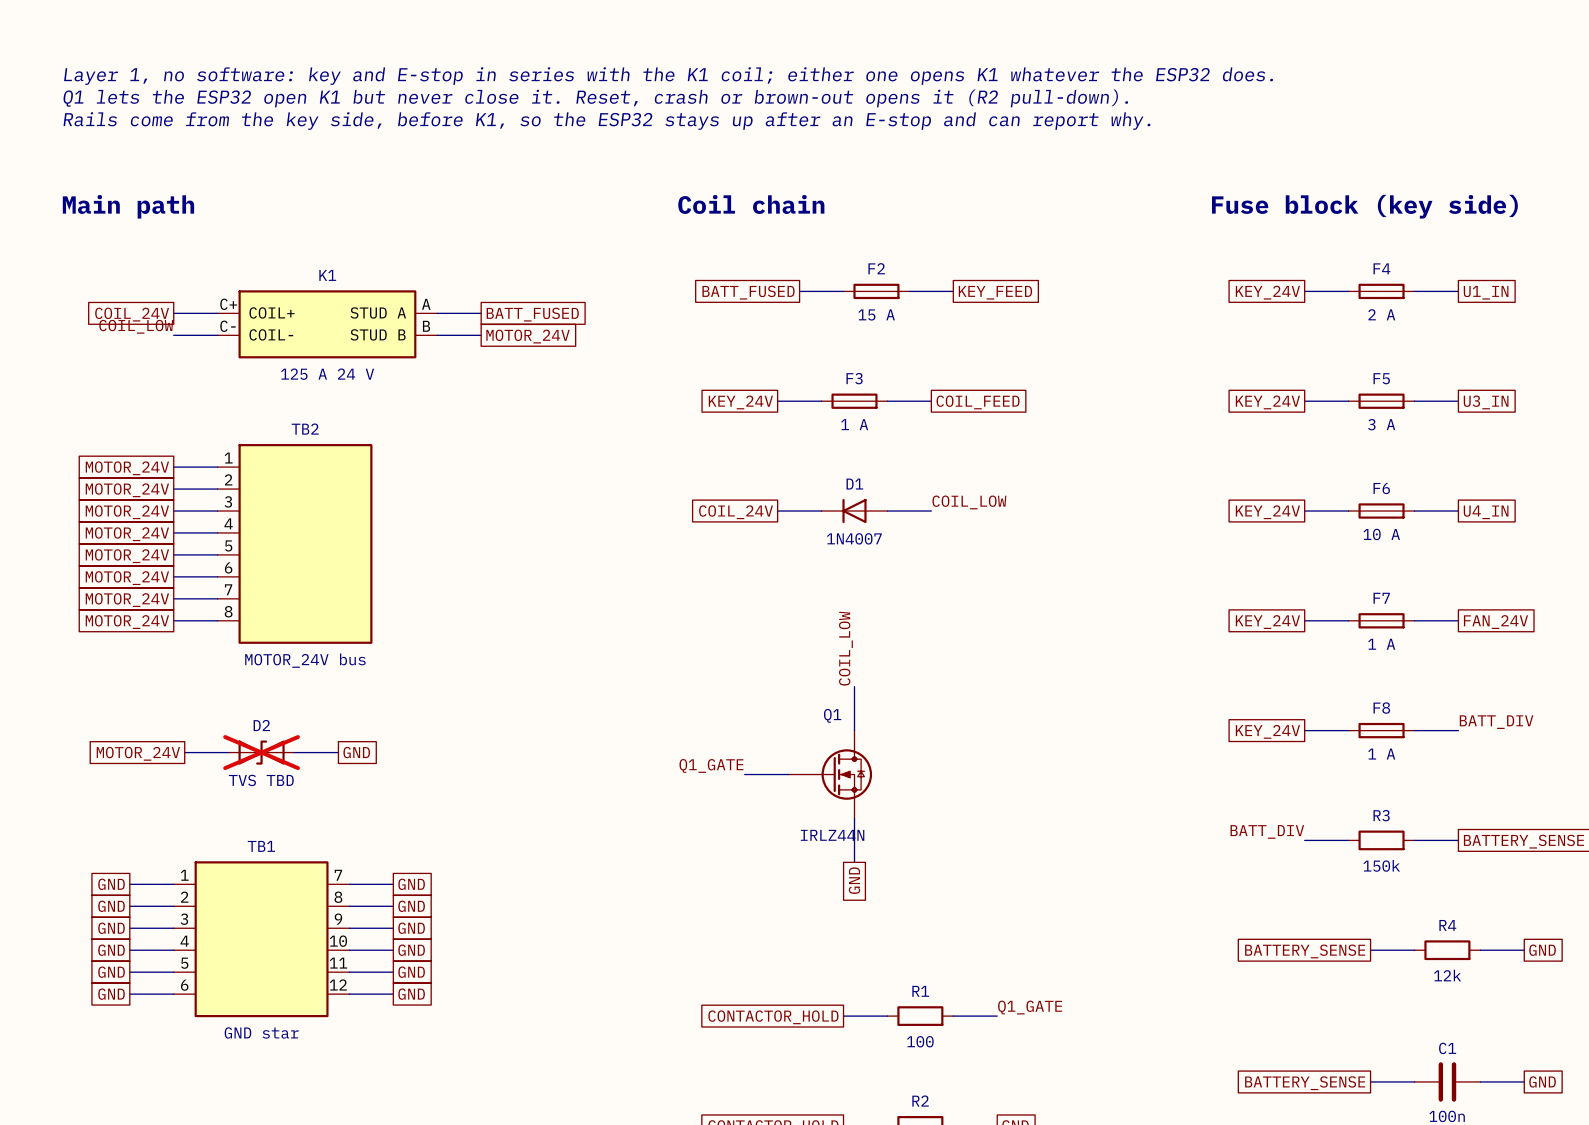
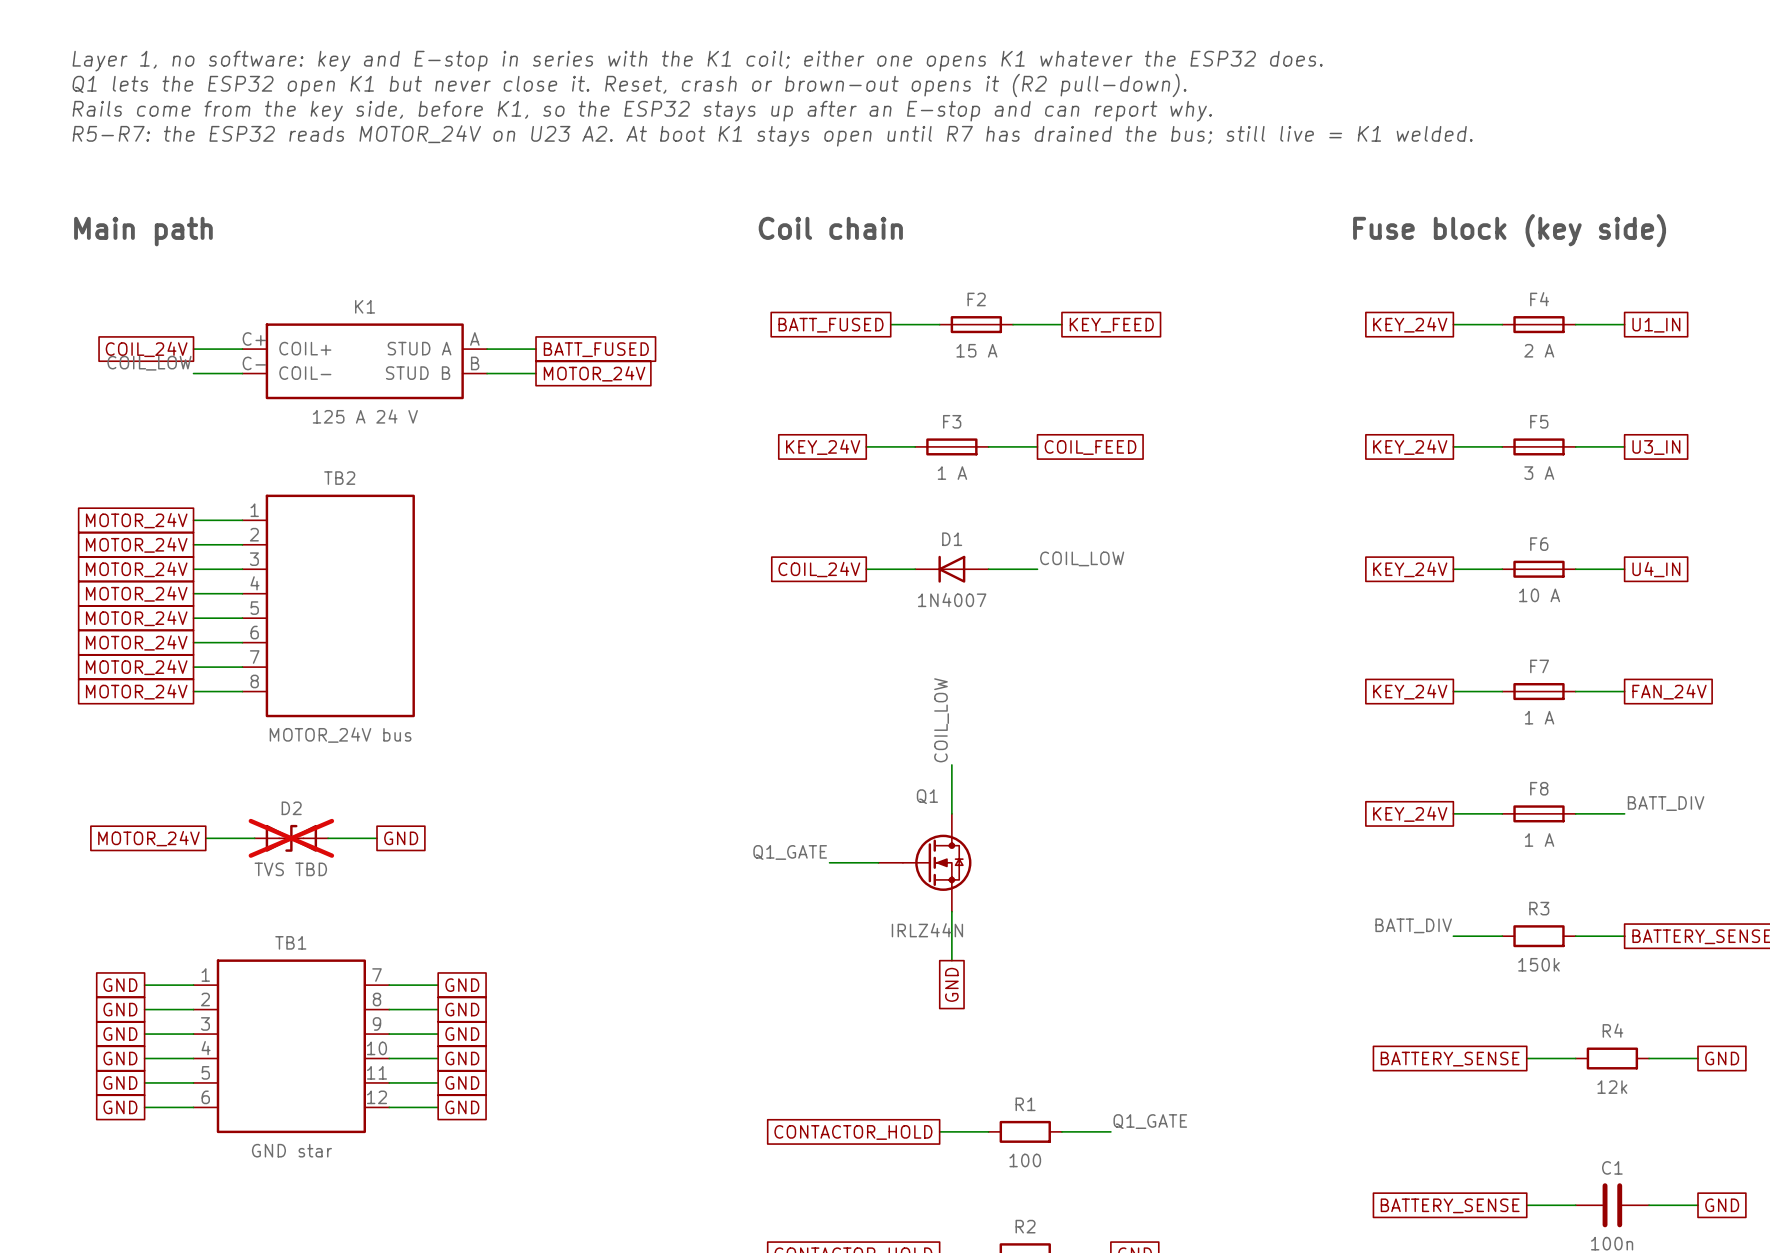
text: none -> Layer 1, no software: key and E-stop in series with the K1 coil; either one opens K1 whatever the ESP32 does. (697, 61)
text: Layer 1, no software: key and E-stop in series with the K1 coil; either one opens K1 whatever the ESP32 does. (668, 76) -> Q1 lets the ESP32 open K1 but never close it. Reset, crash or brown-out opens it (R2 pull-down). (629, 85)
text: Q1 lets the ESP32 open K1 but never close it. Reset, crash or brown-out opens it (R2 pull-down). (595, 98) -> Rails come from the key side, before K1, so the ESP32 stays up after an E-stop and can report why. (642, 111)
text: Rails come from the key side, before K1, so the ESP32 stays up after an E-stop and can report why. (606, 121) -> R5-R7: the ESP32 reads MOTOR_24V on U23 A2. At boot K1 stays open until R7 has drained the bus; still live = K1 welded. (772, 135)

